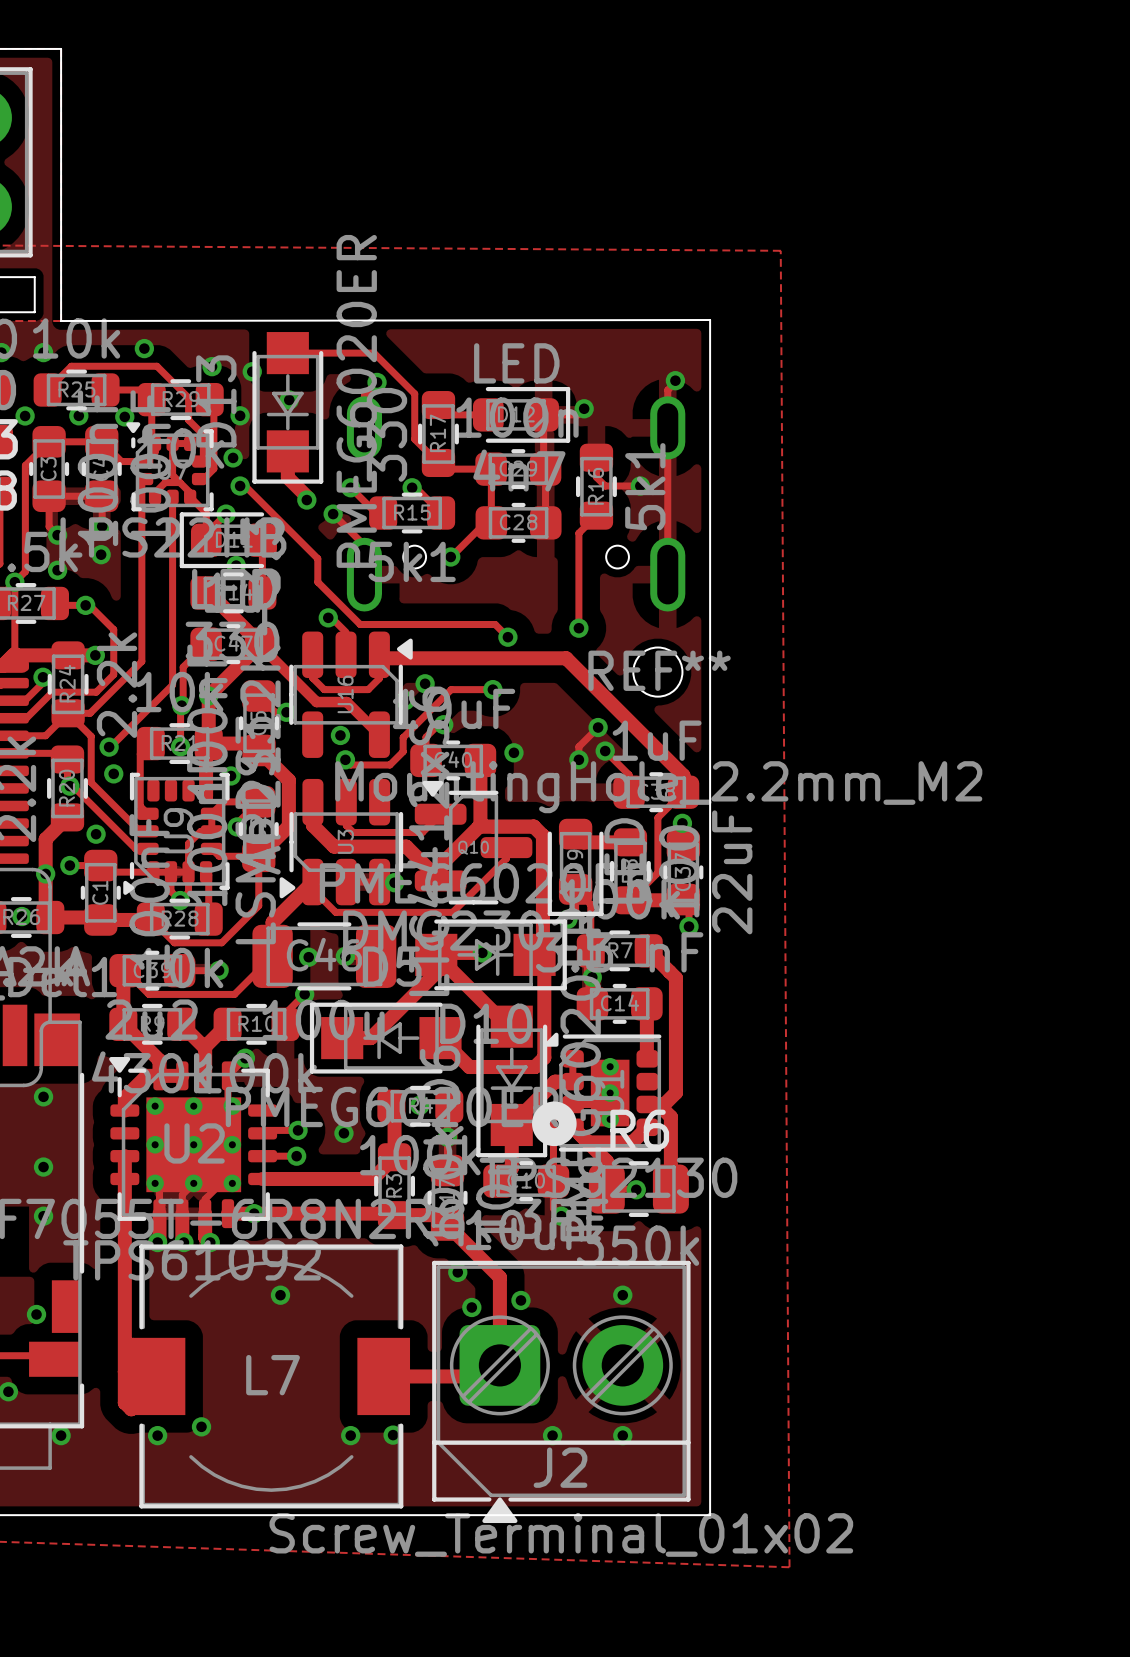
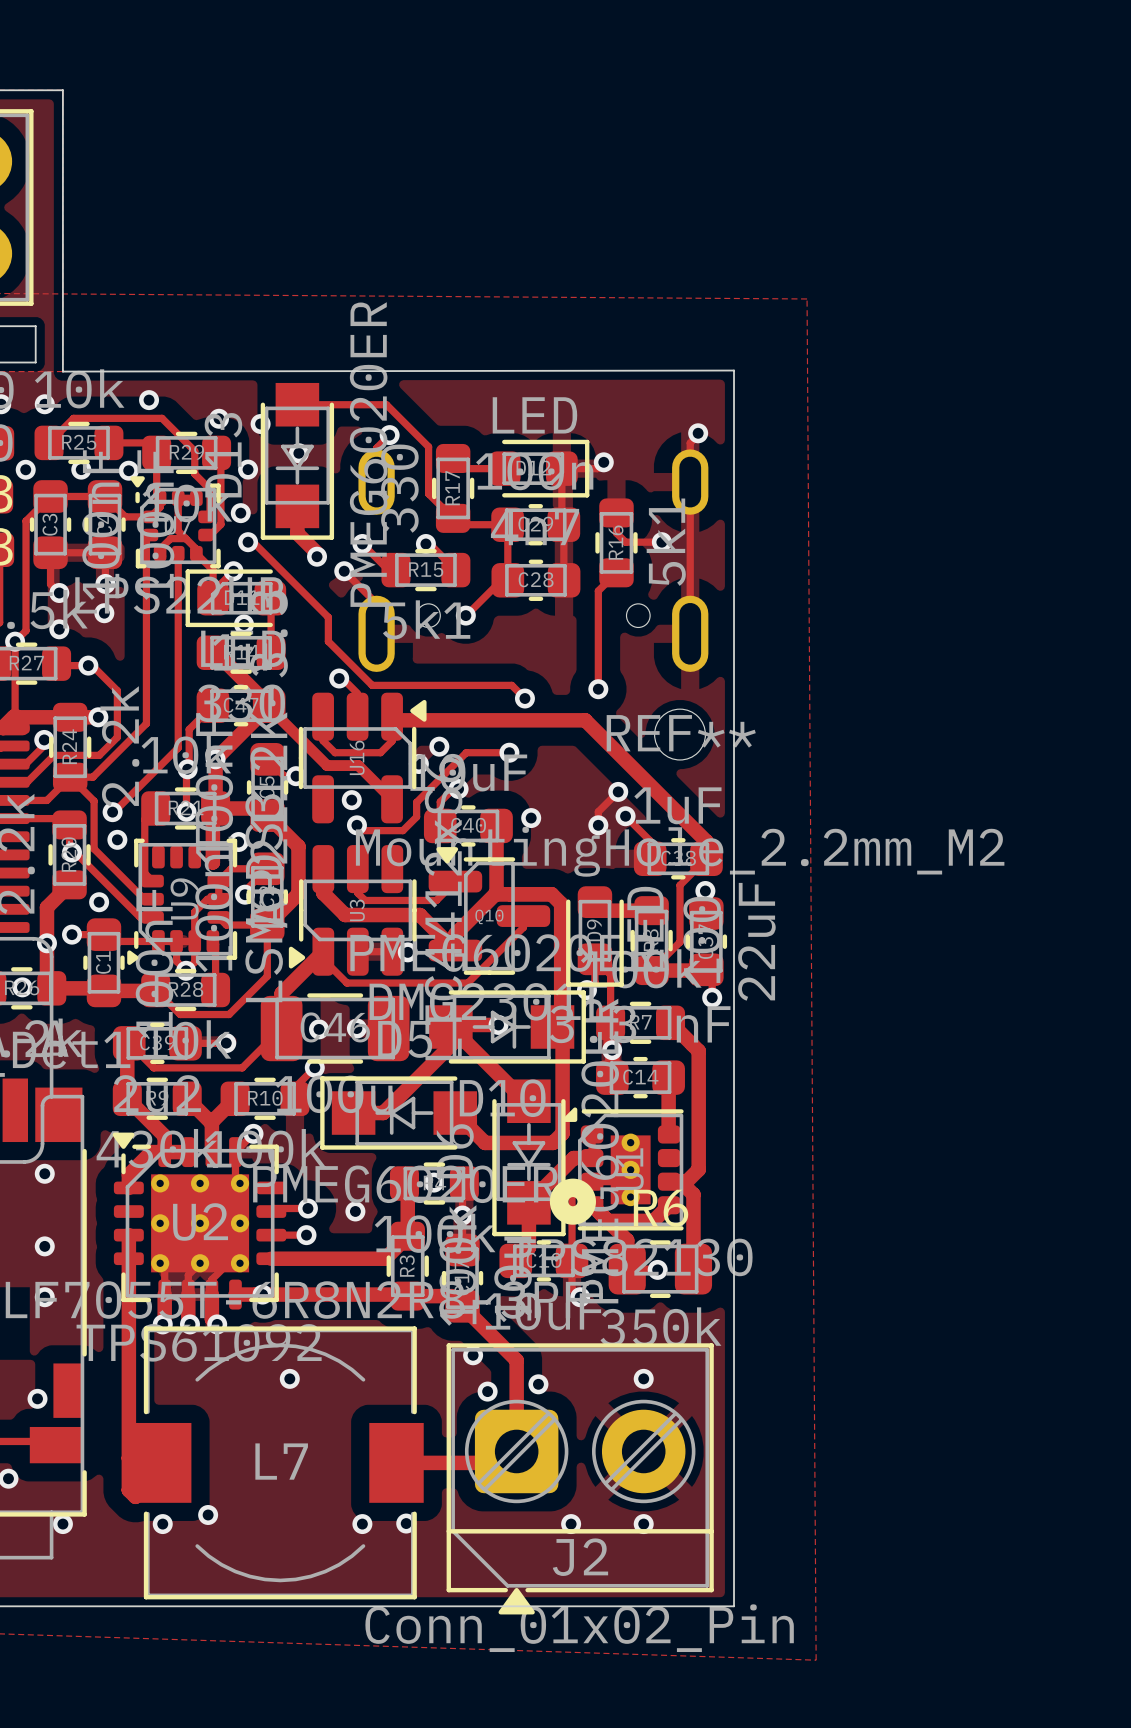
J2 value: Screw_Terminal_01x02 (561, 1534) -> Conn_01x02_Pin (579, 1628)

